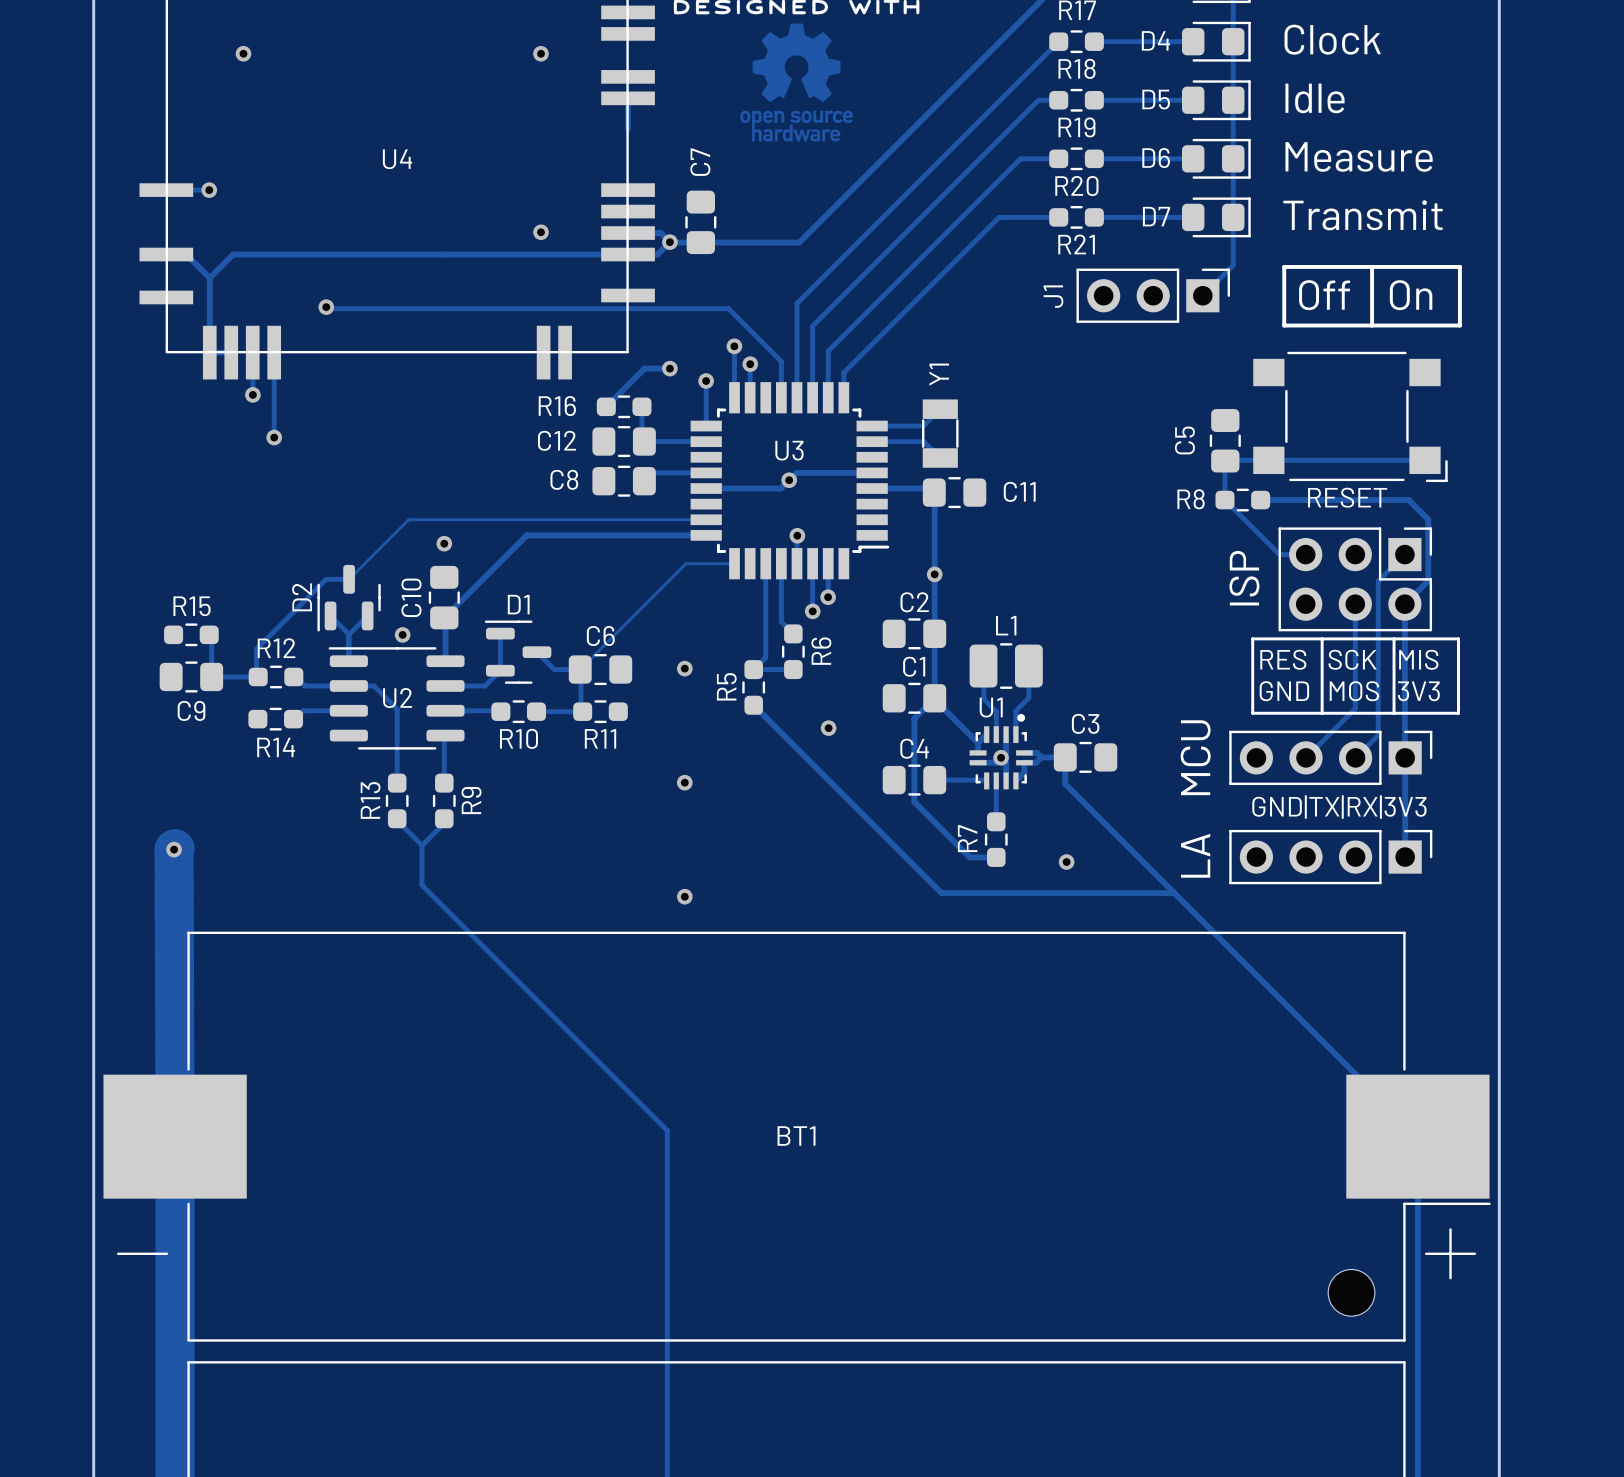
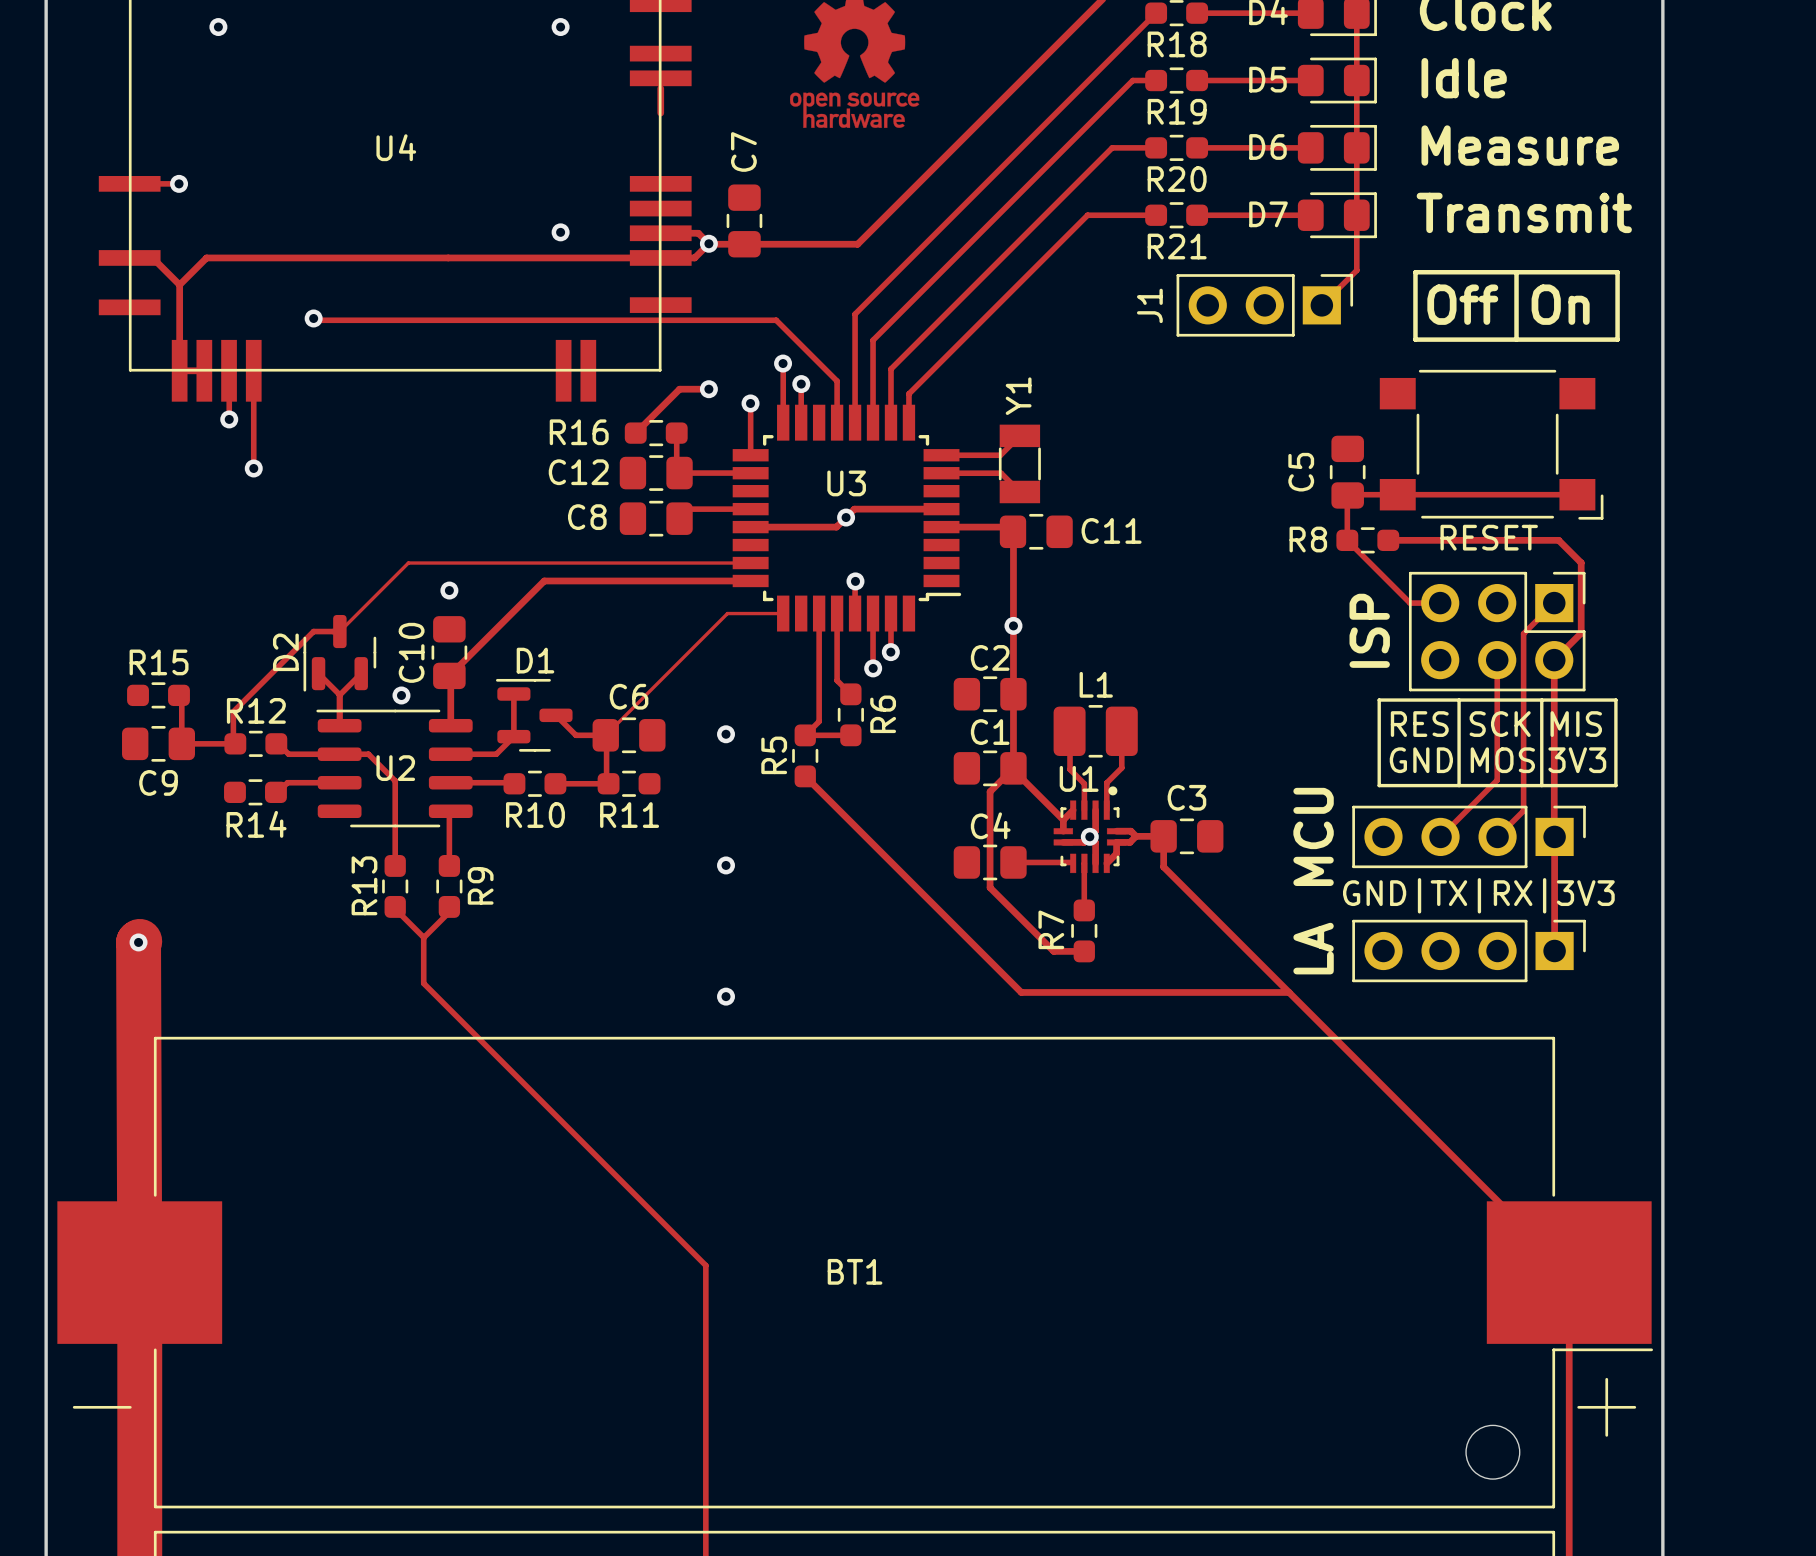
via: (828, 728) -> none
via: (1066, 862) -> none

